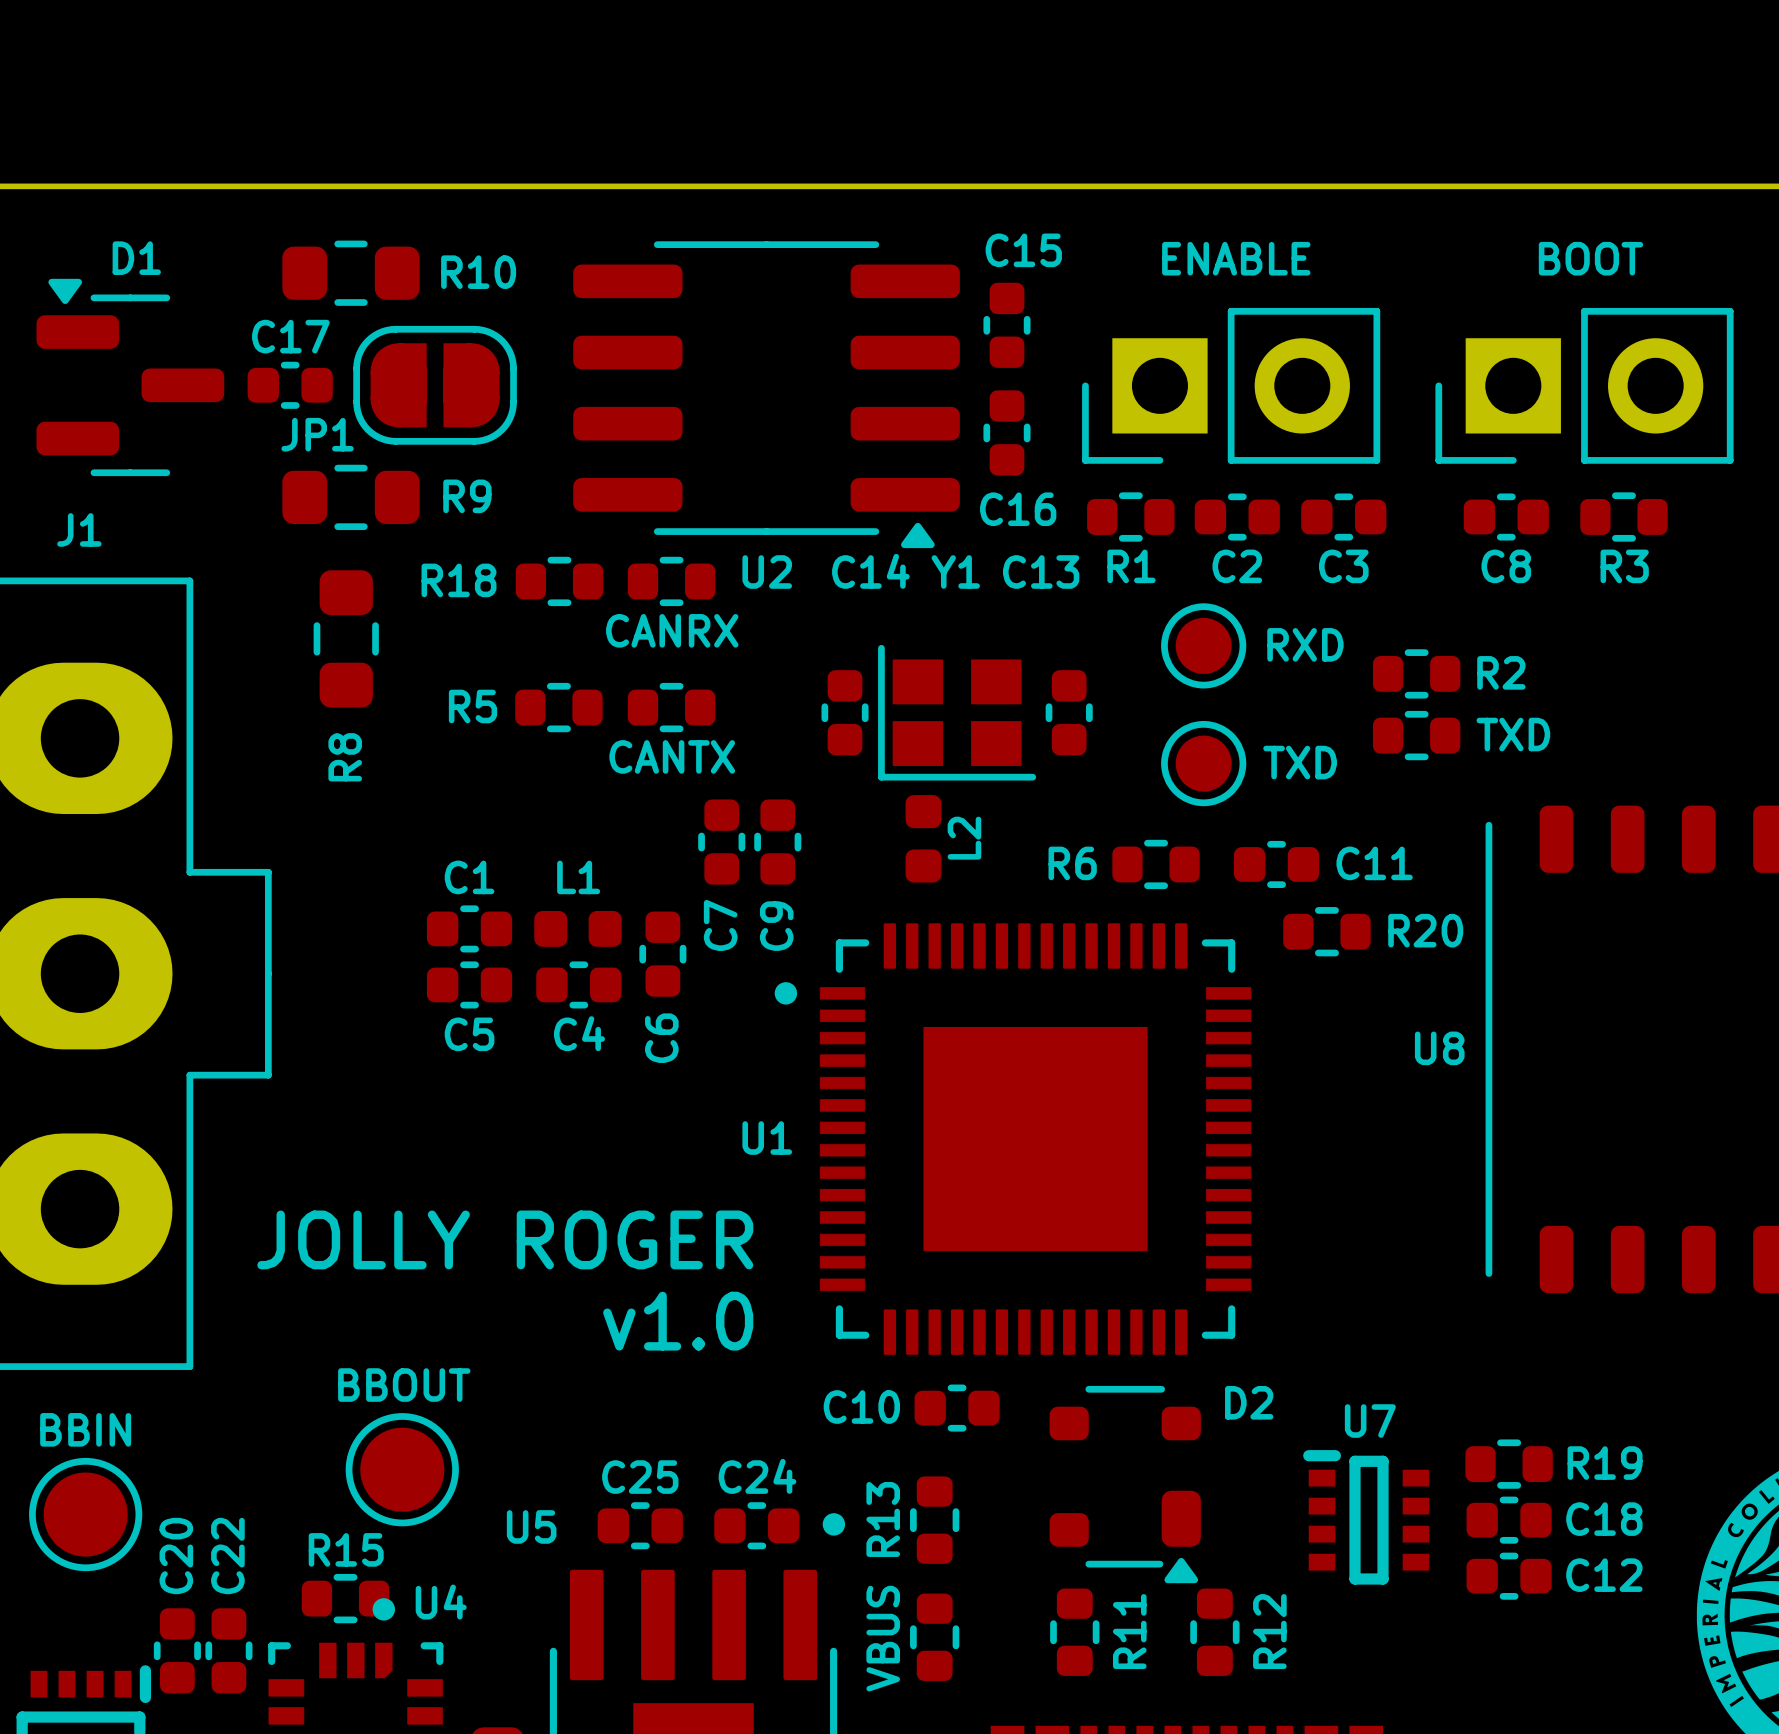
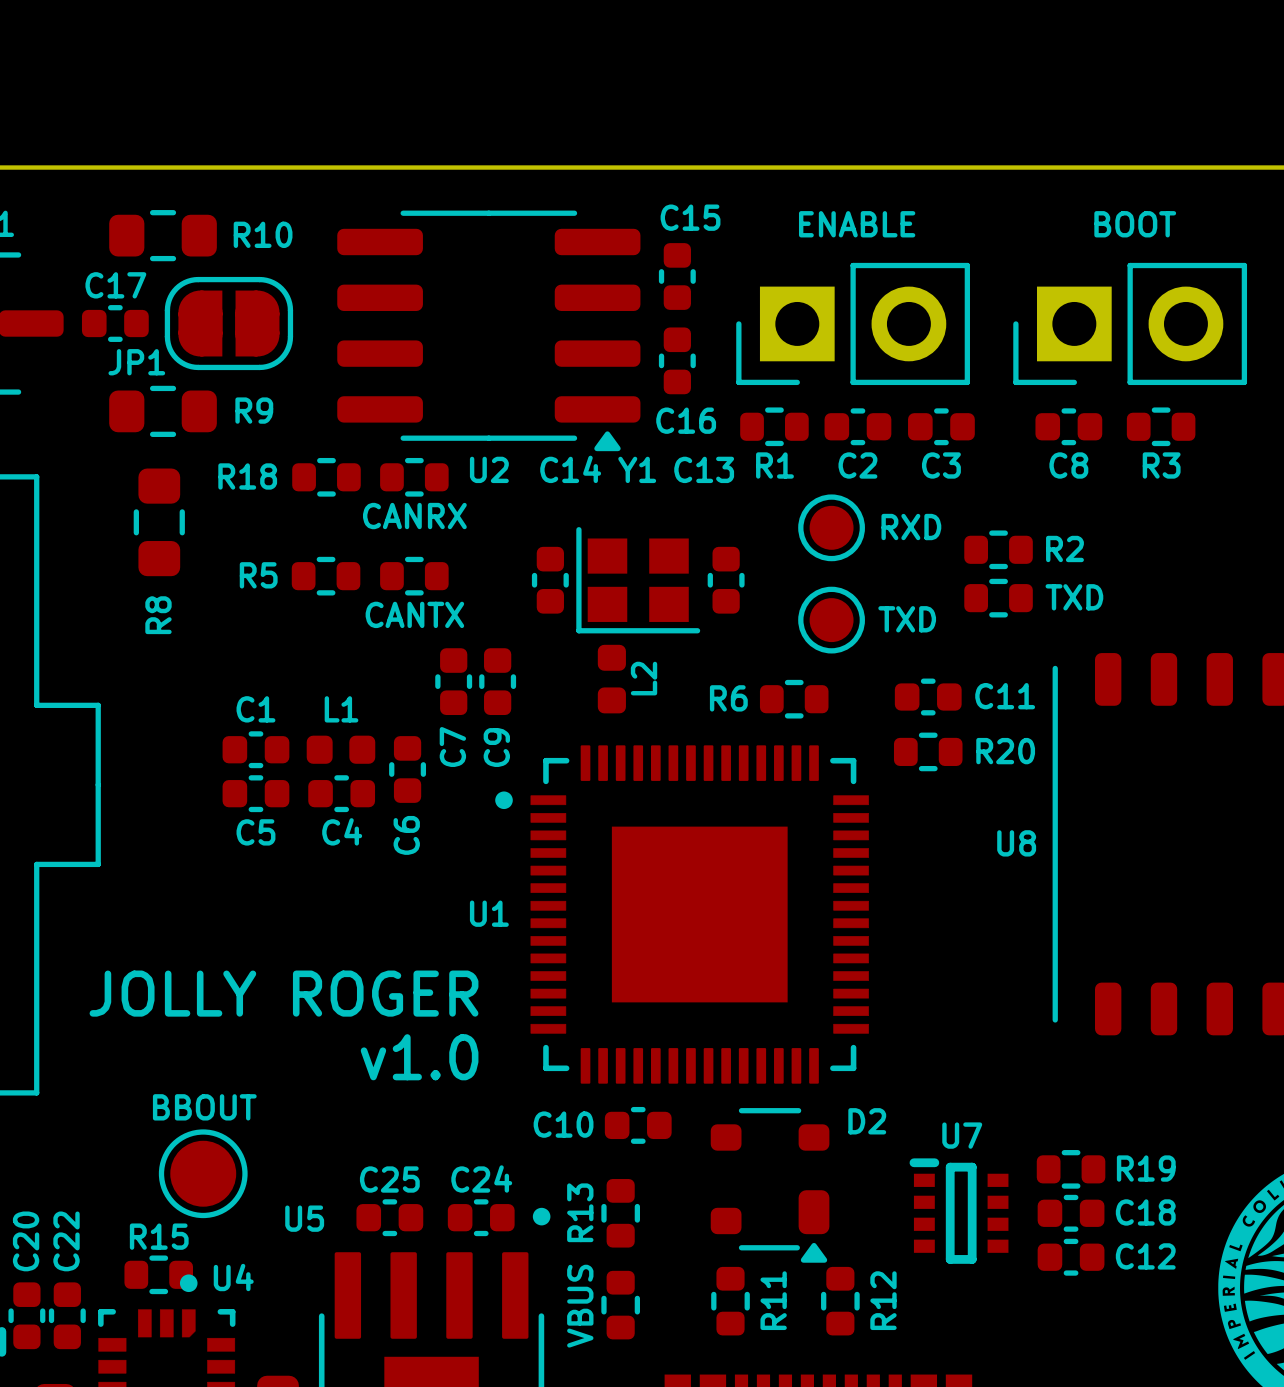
C11 position: (1276, 864) -> (928, 697)

